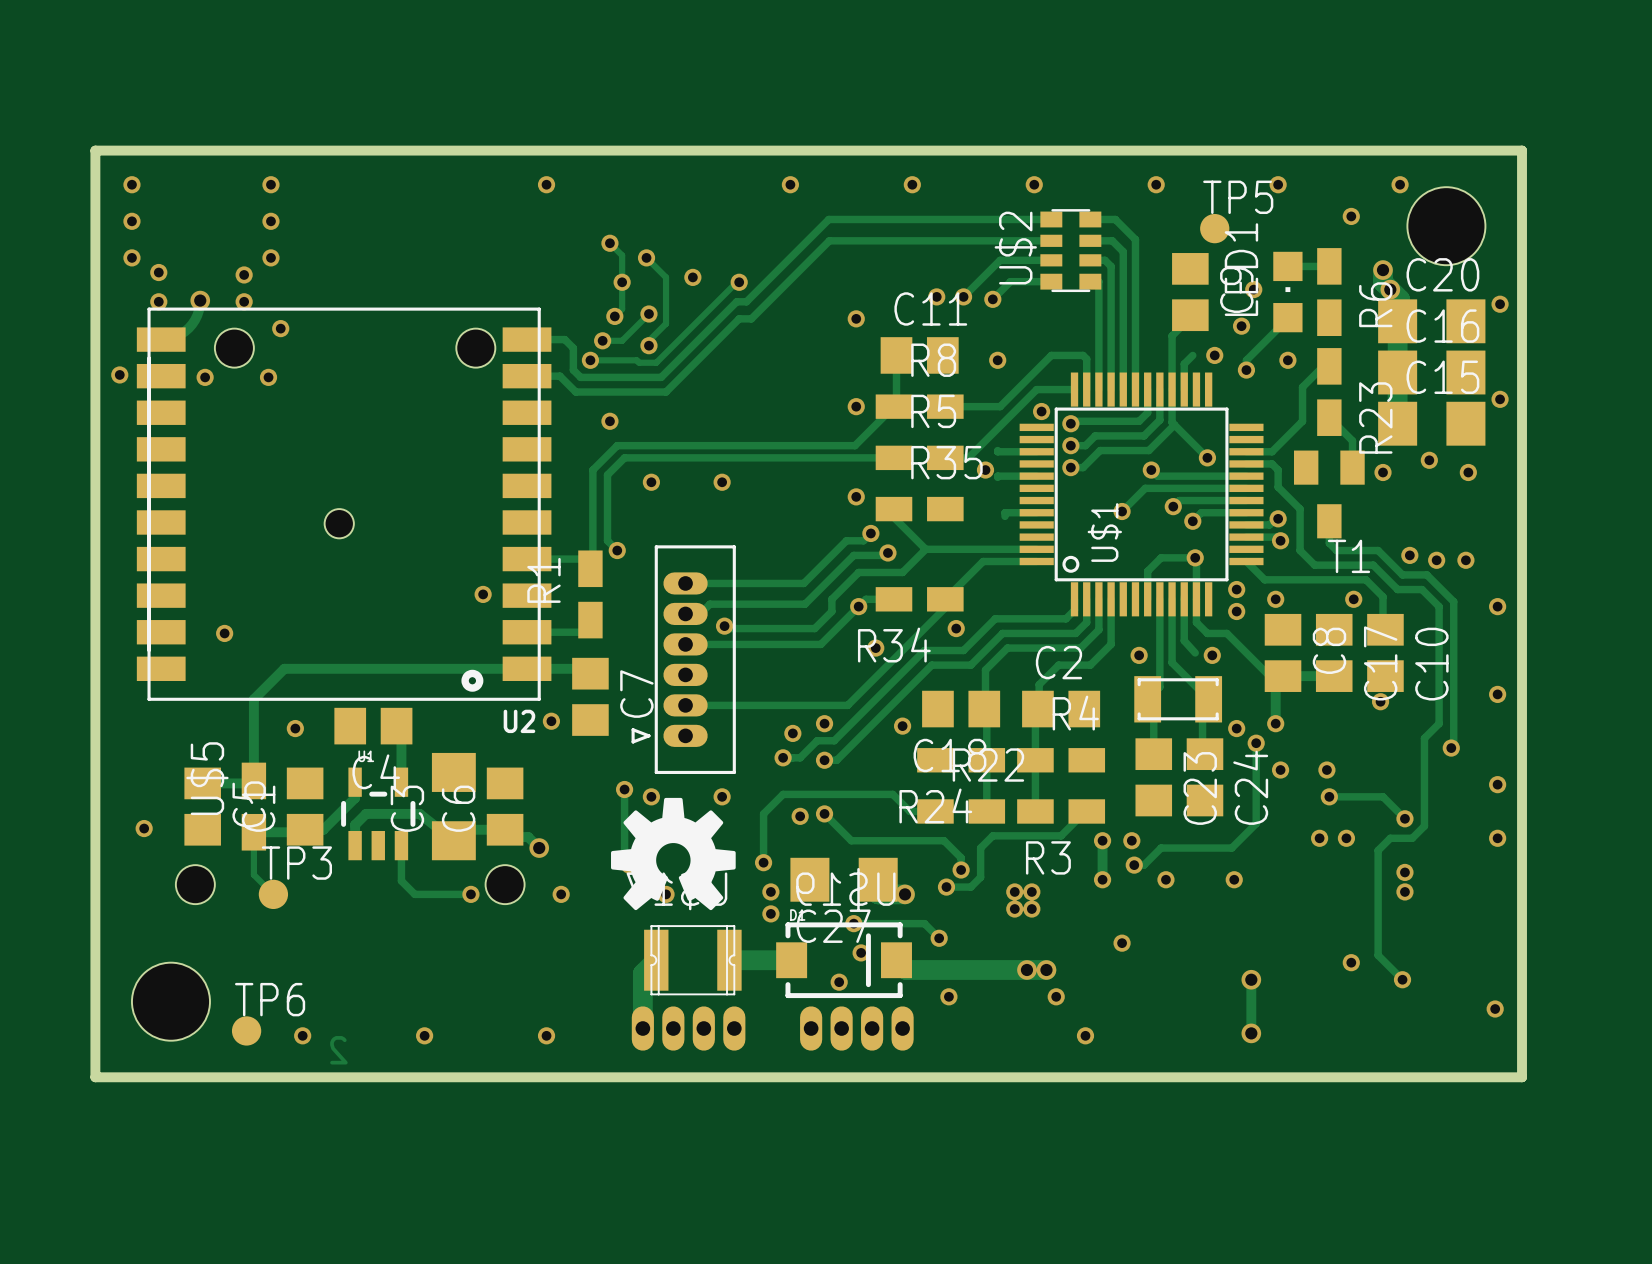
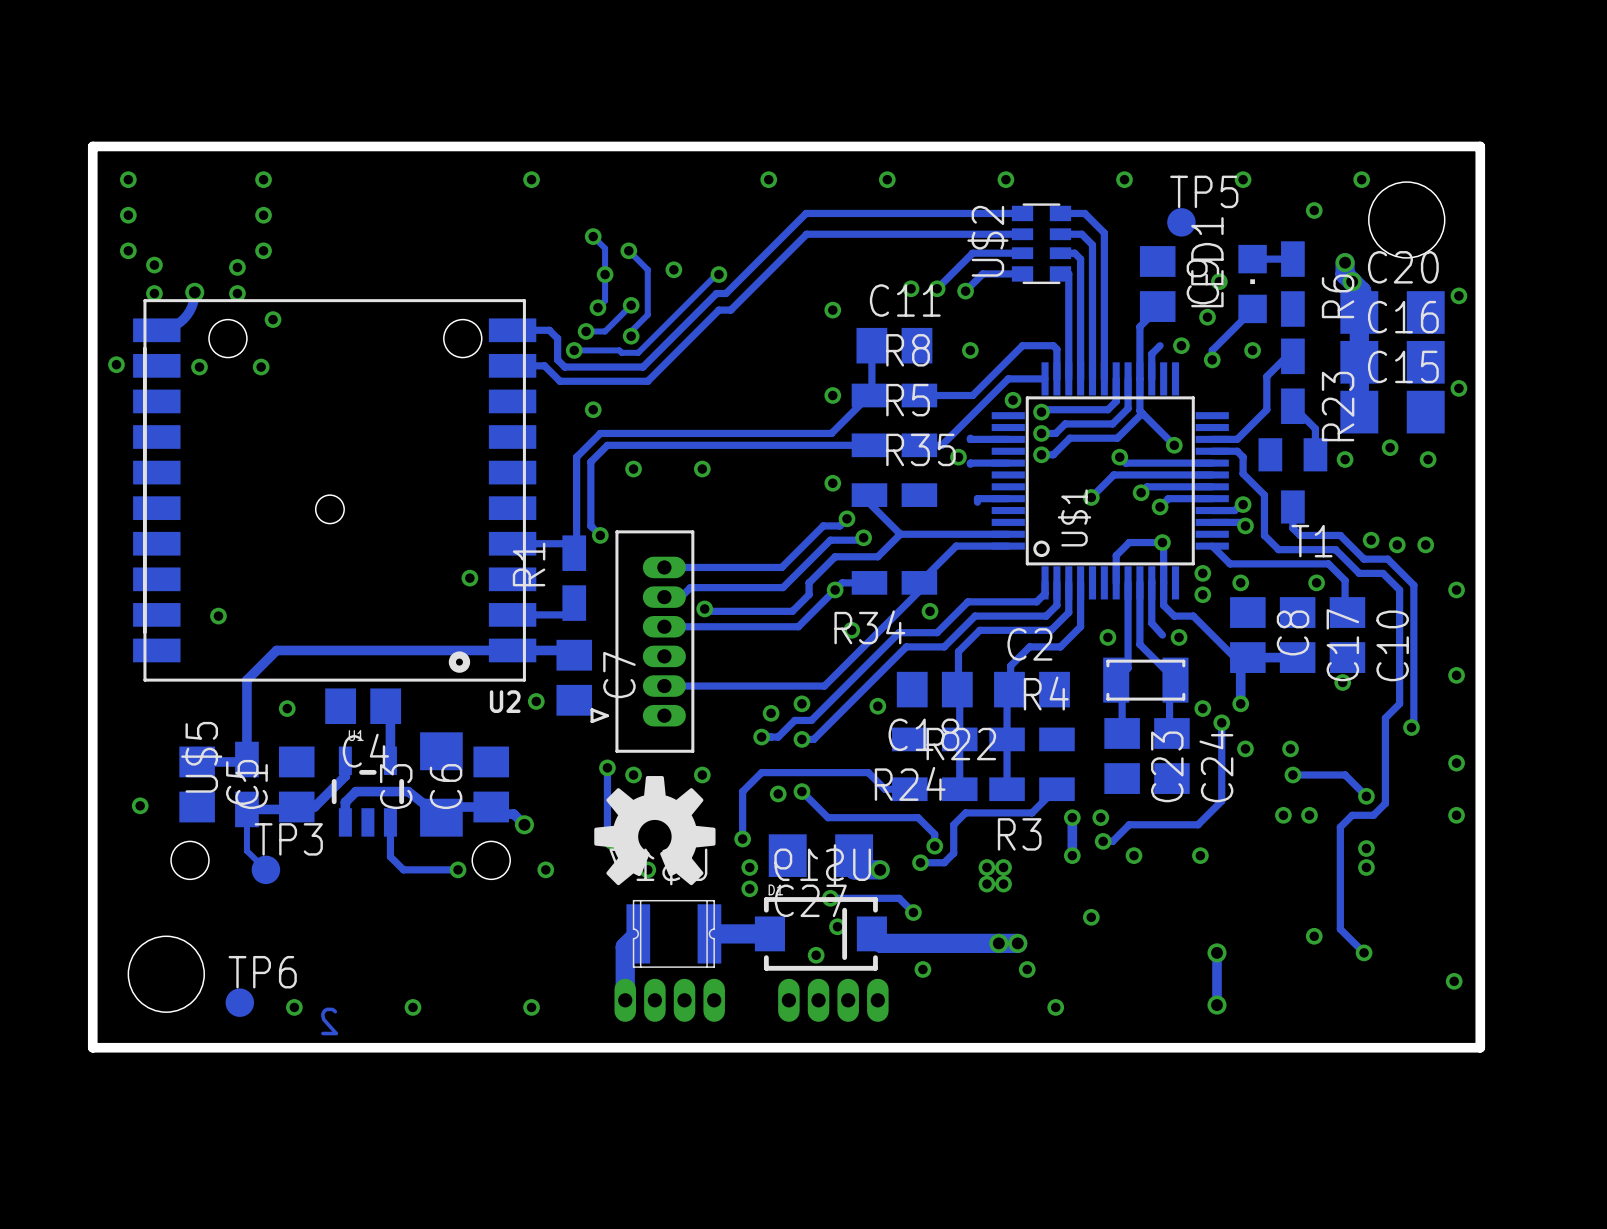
part footprint: [631, 545, 736, 775] -> [590, 530, 695, 753]

